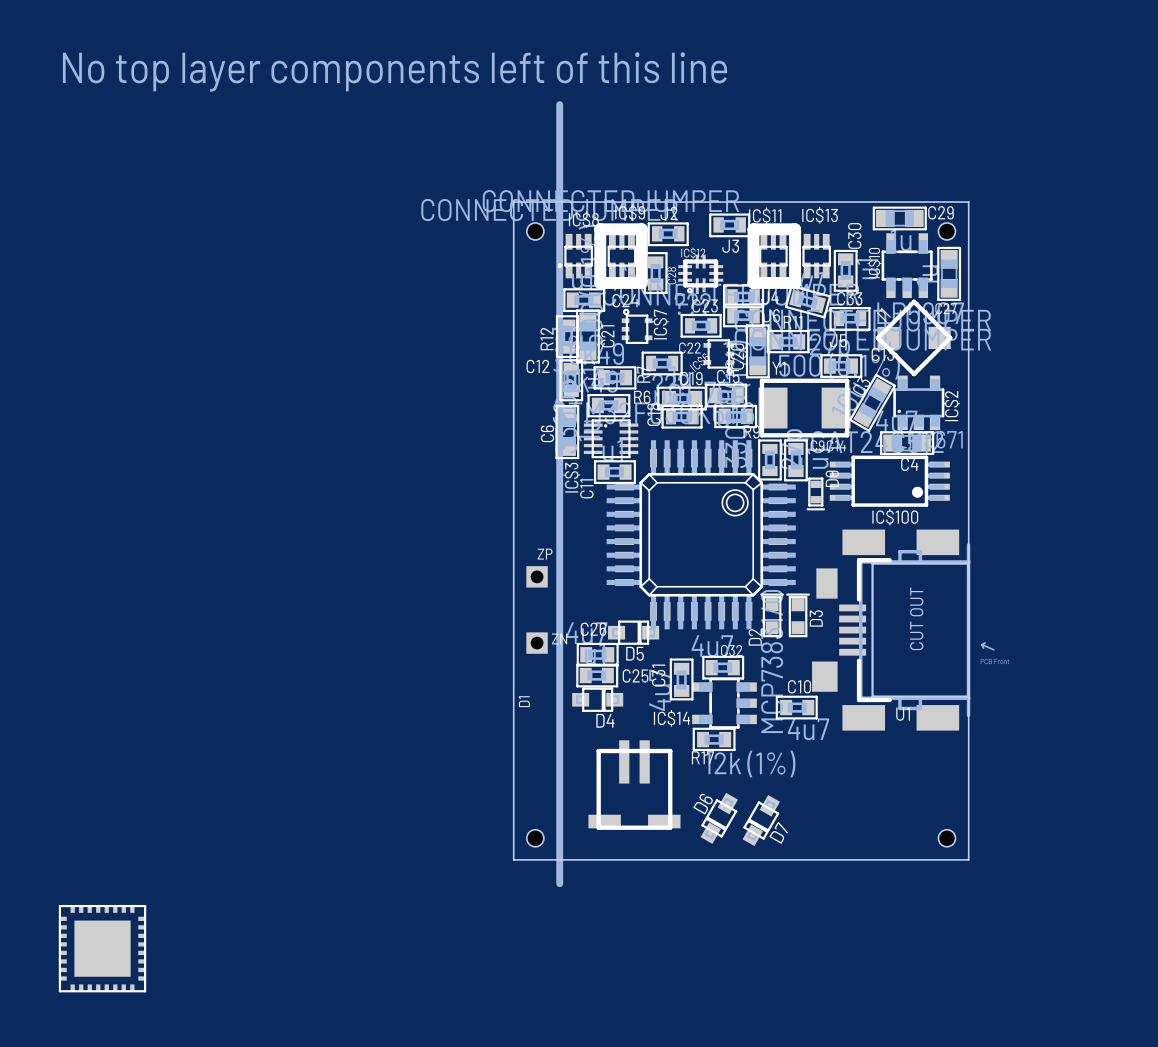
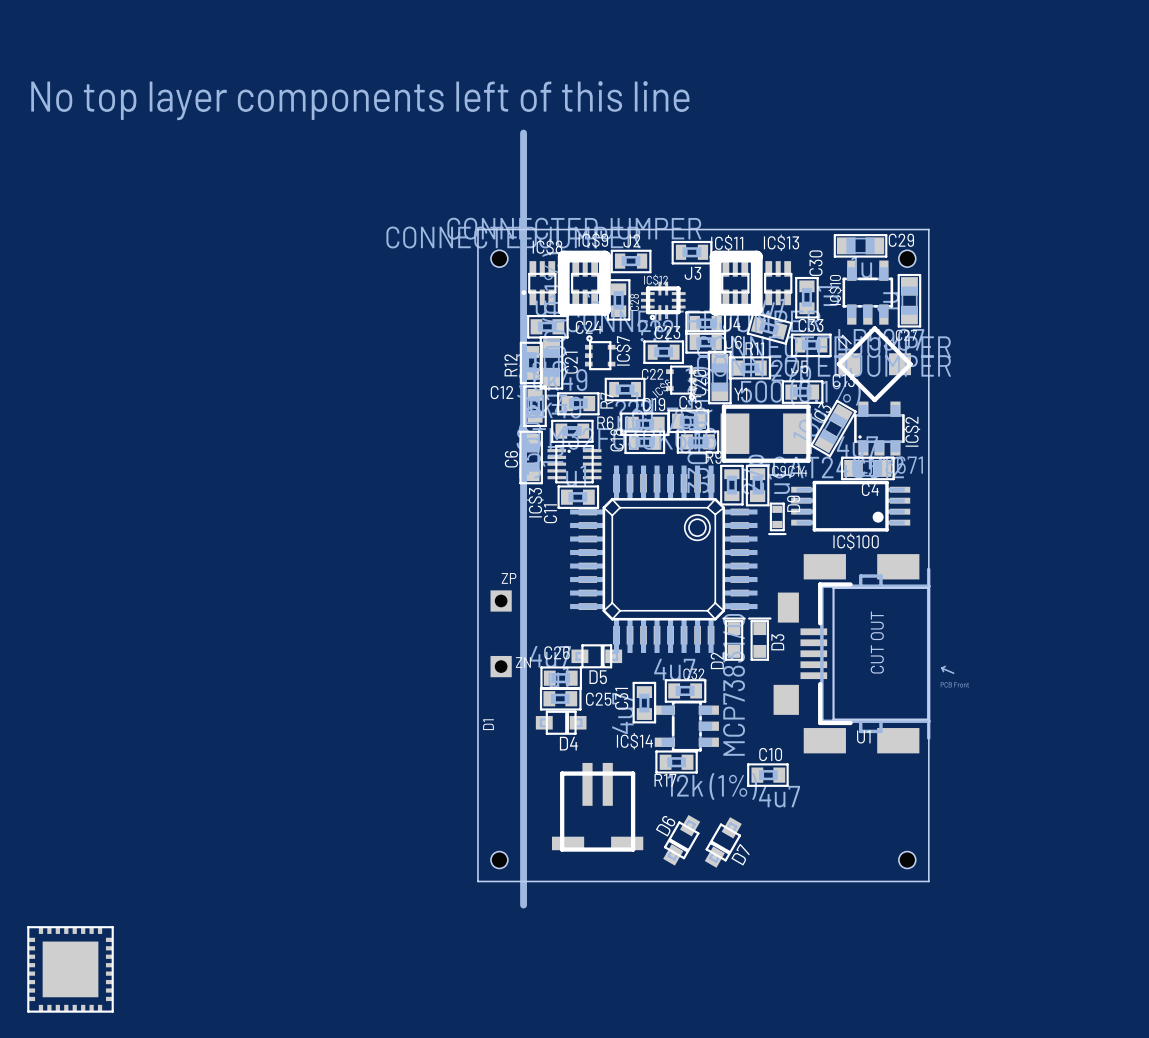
C10 position: (796, 707) -> (767, 775)

